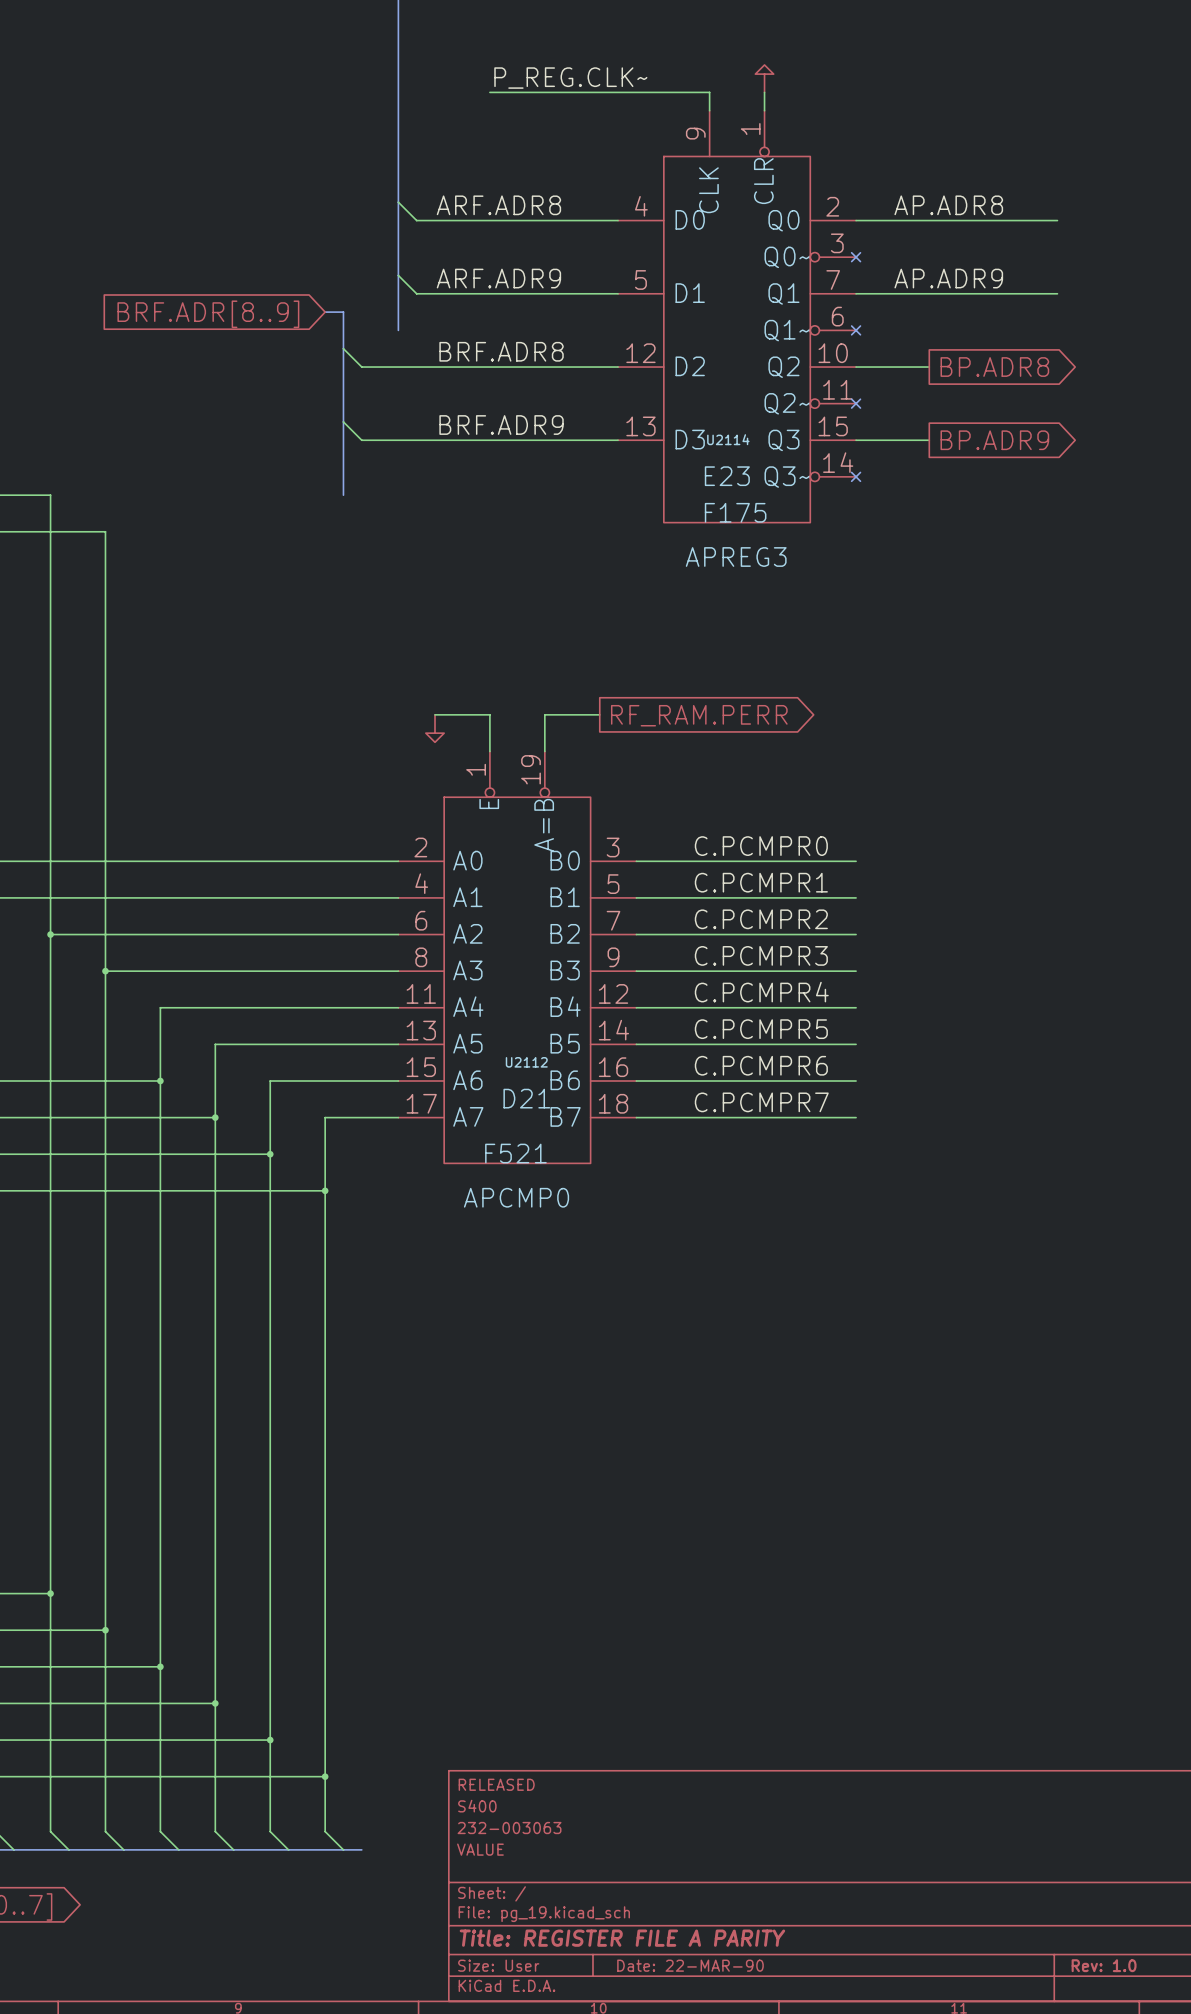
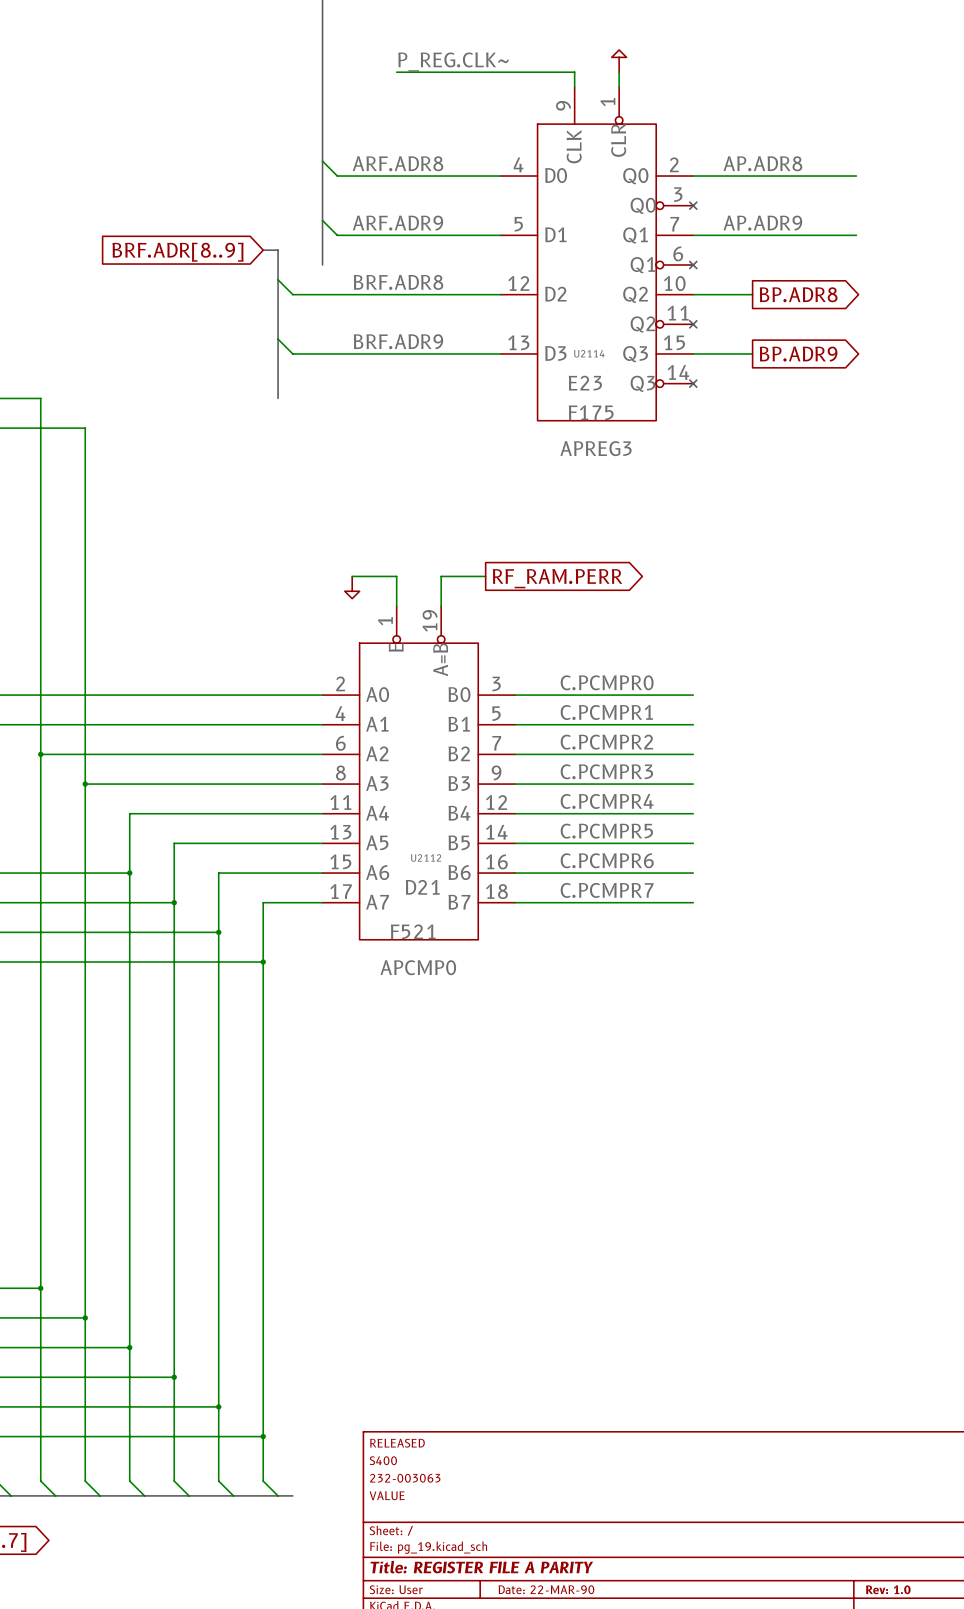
U2114 pin name: Q0~ (786, 257) -> Q0 (643, 205)
U2114 pin name: Q1~ (786, 330) -> Q1 (642, 265)
U2114 pin name: Q2~ (786, 403) -> Q2 (642, 324)
U2114 pin name: Q3~ (786, 477) -> Q3 (642, 383)

